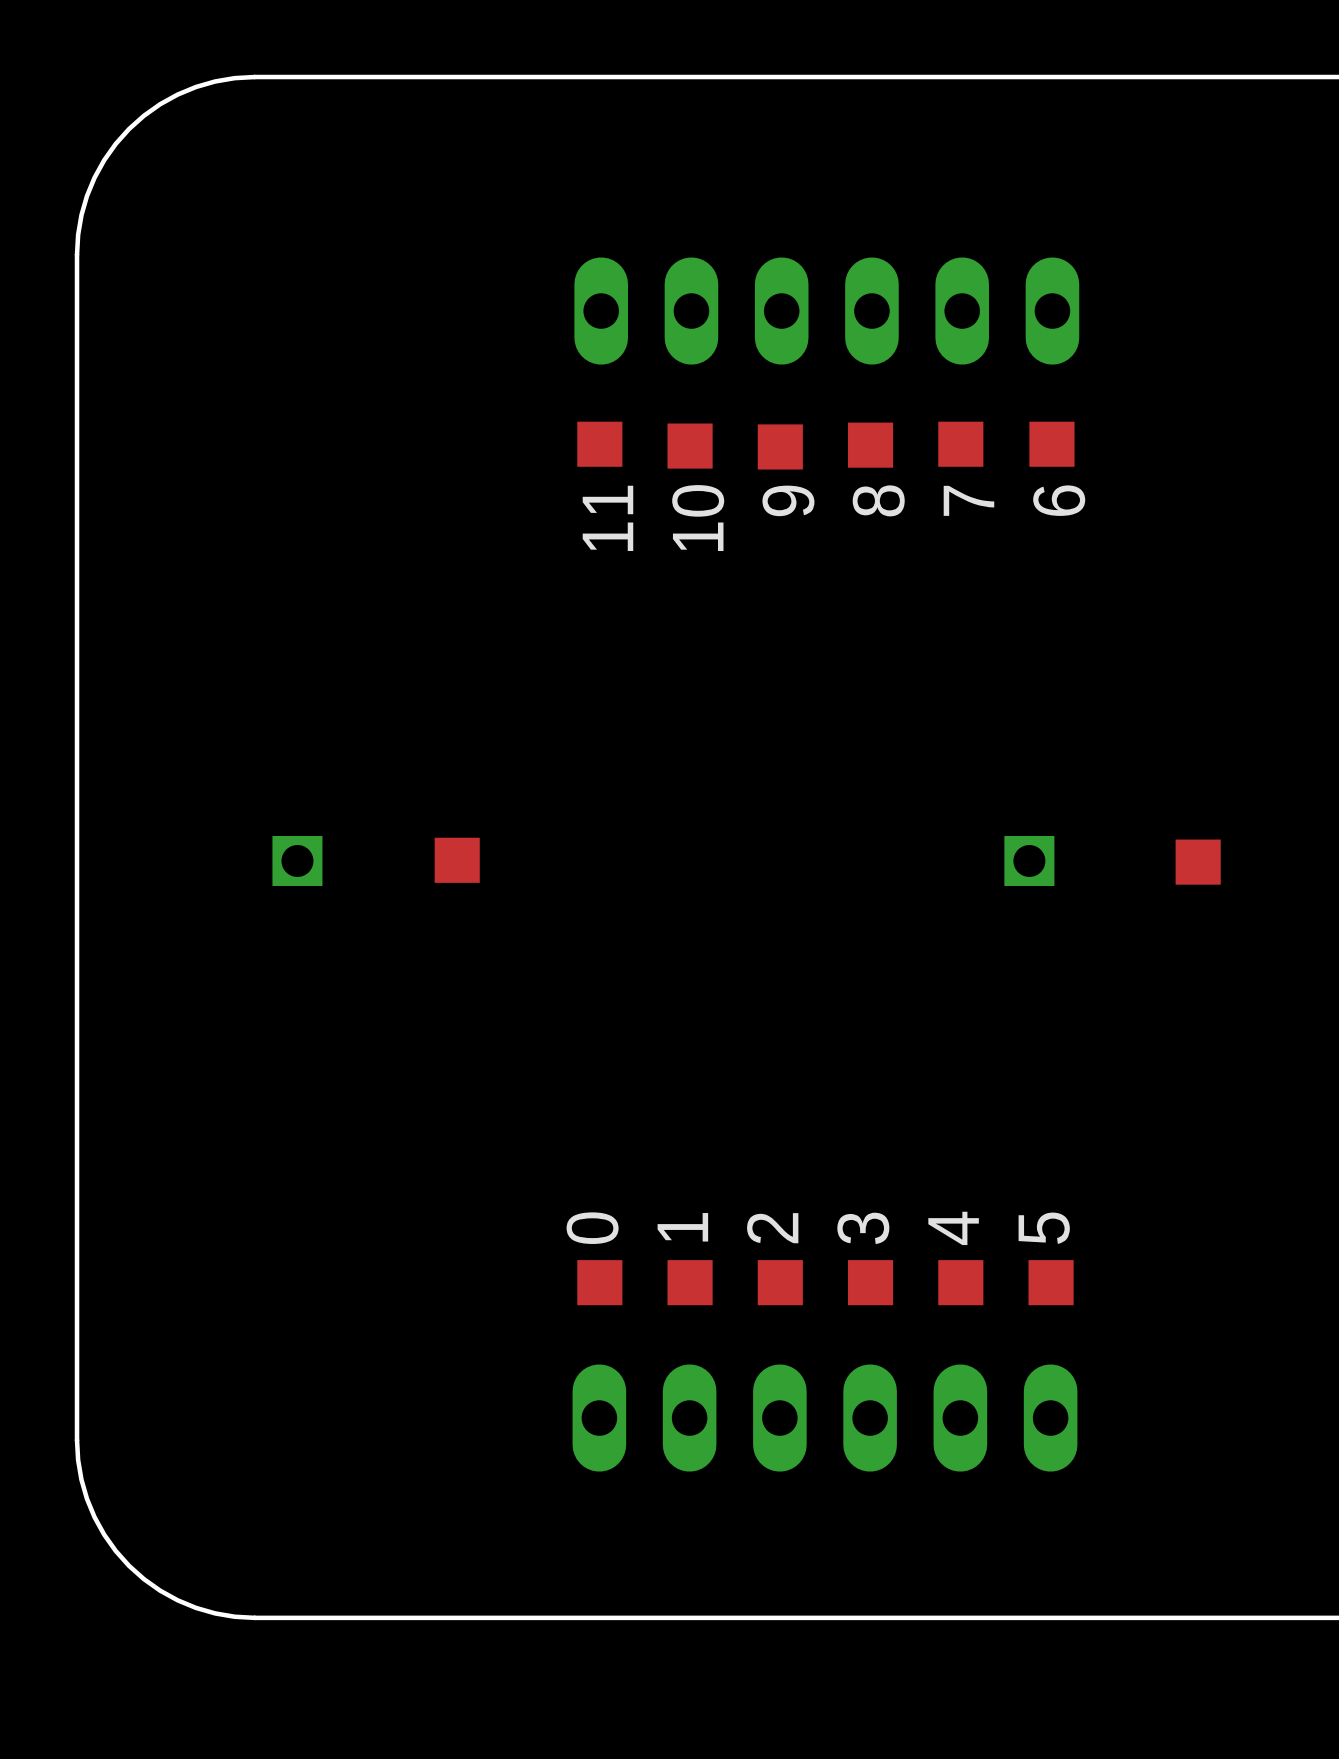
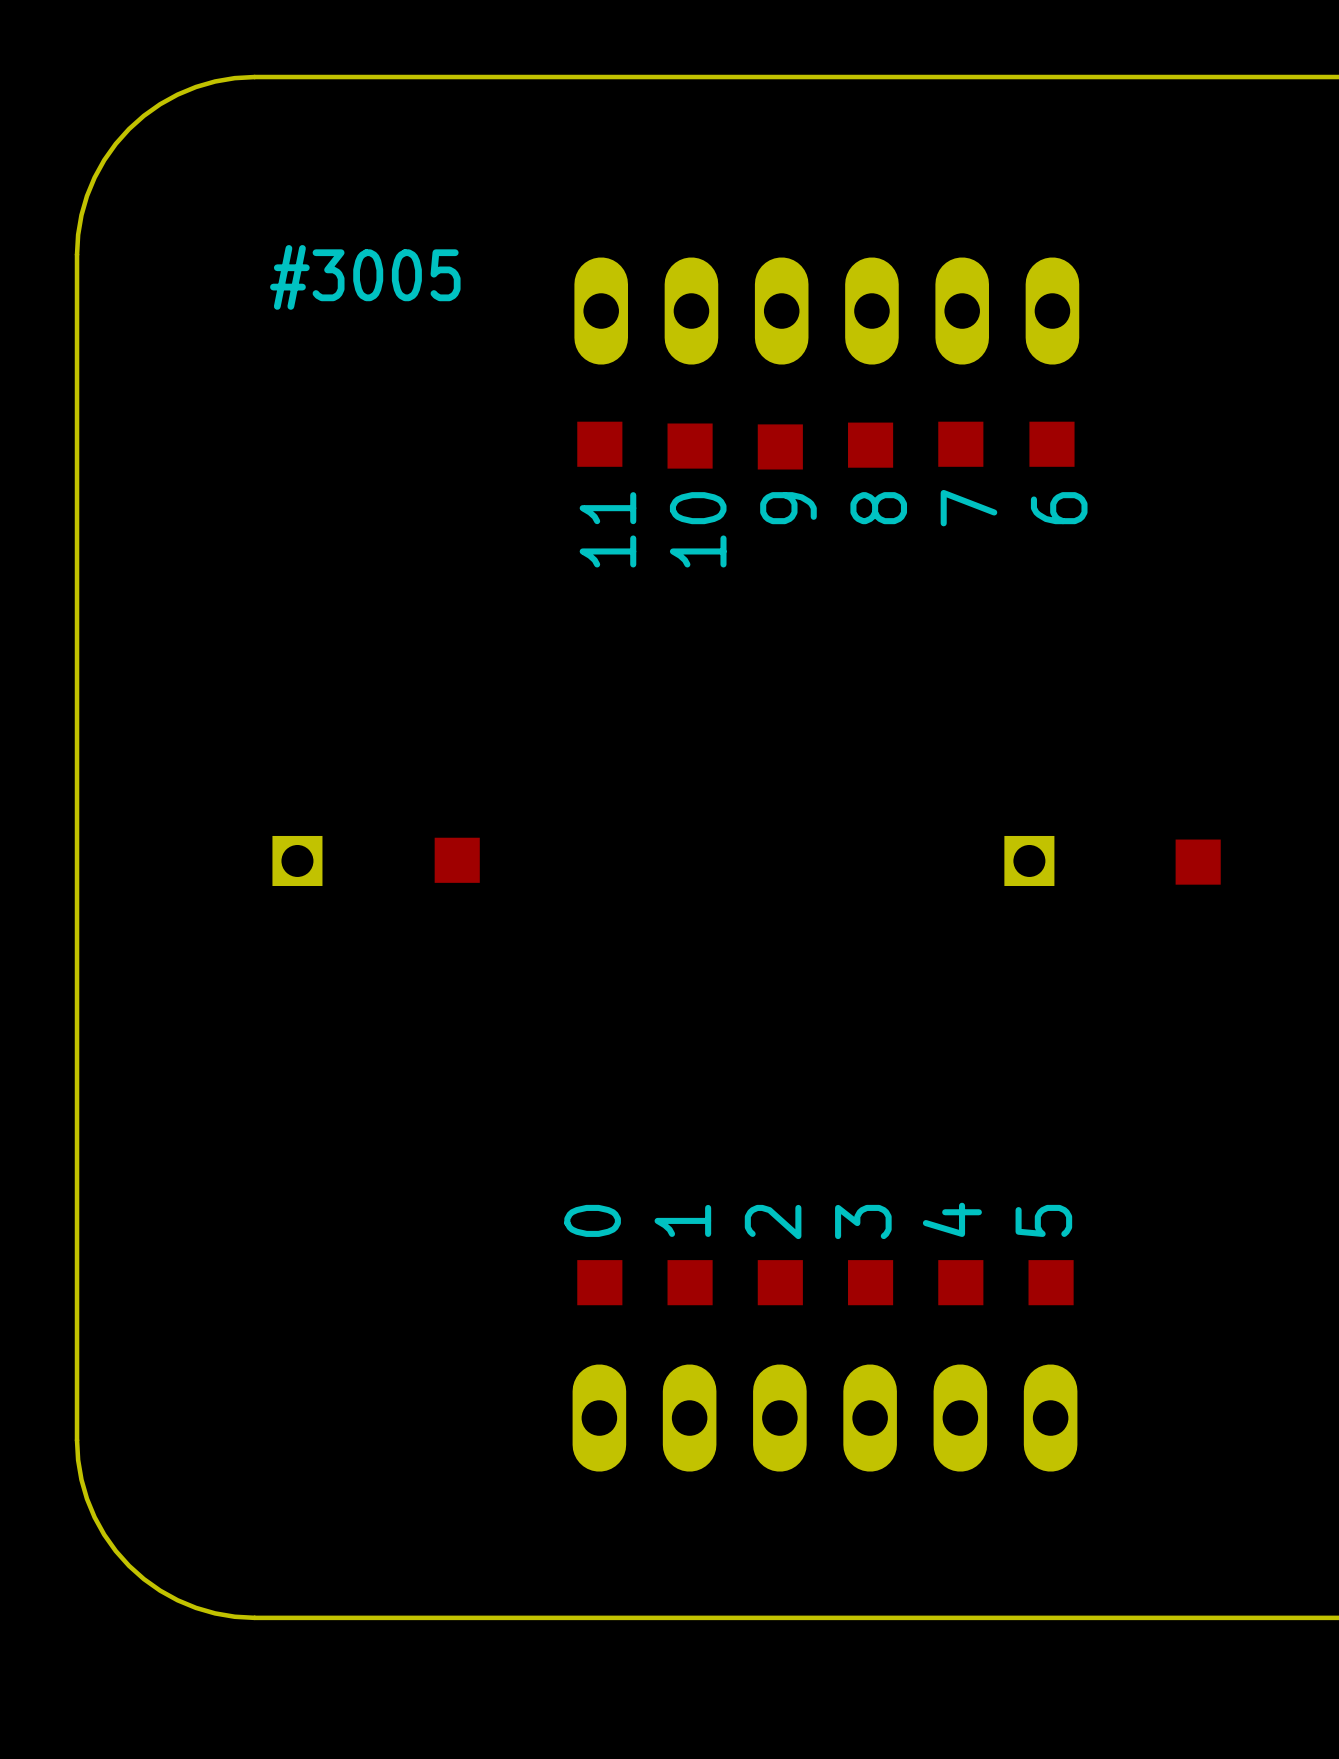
text: none -> #3005 (365, 277)

